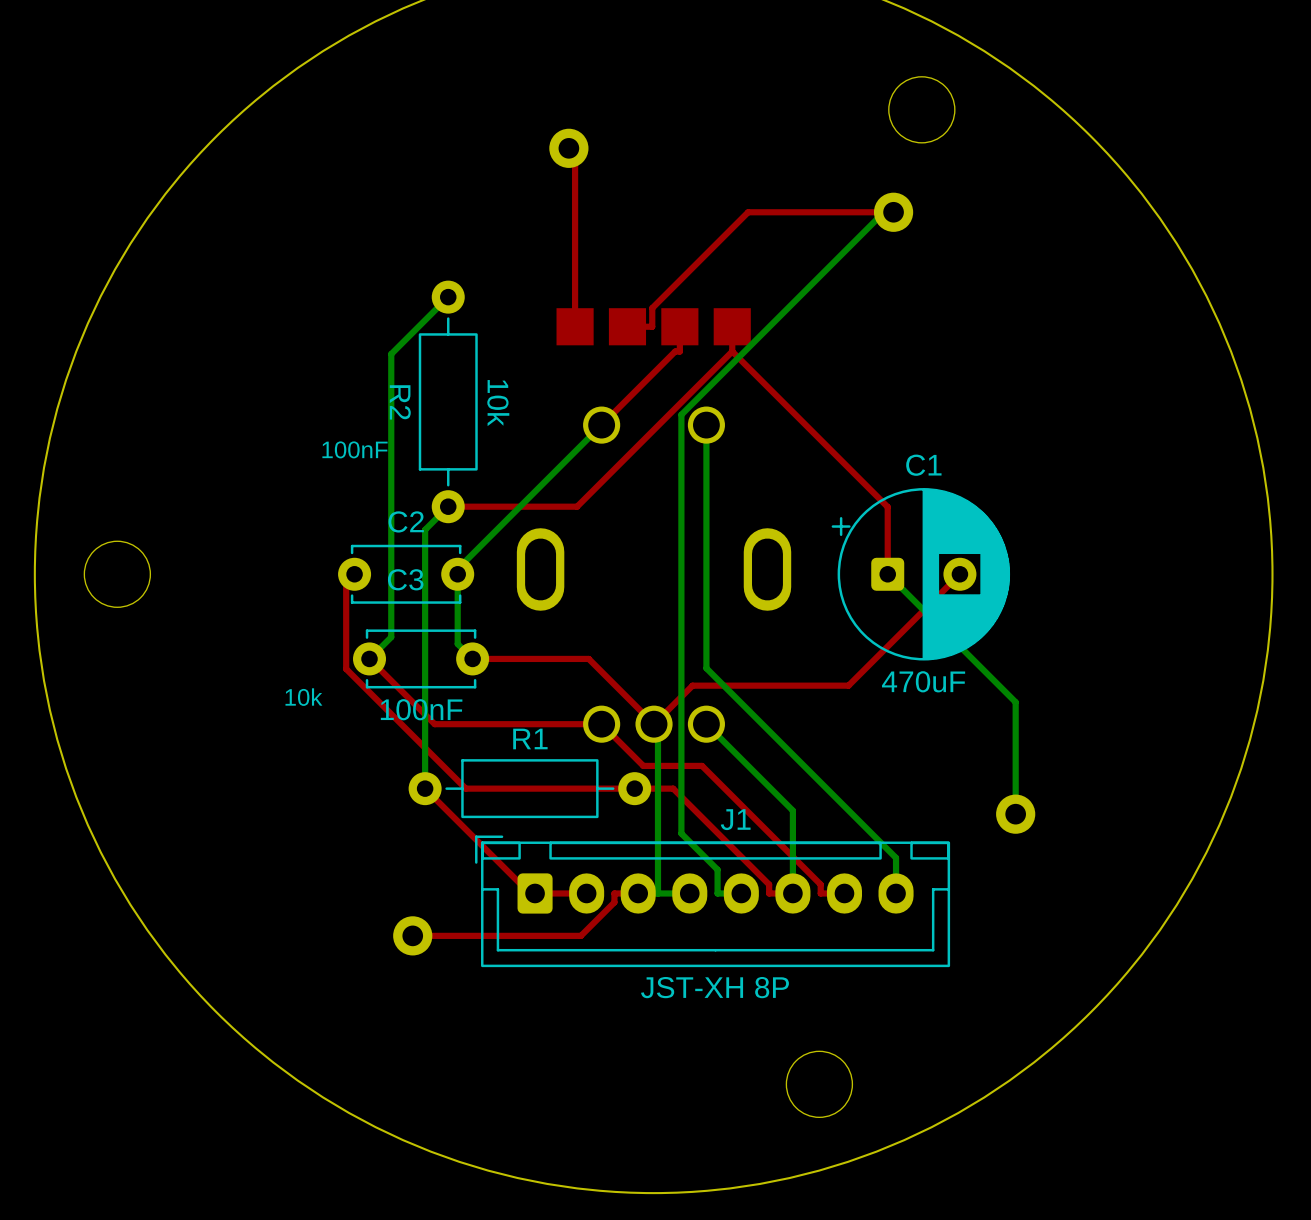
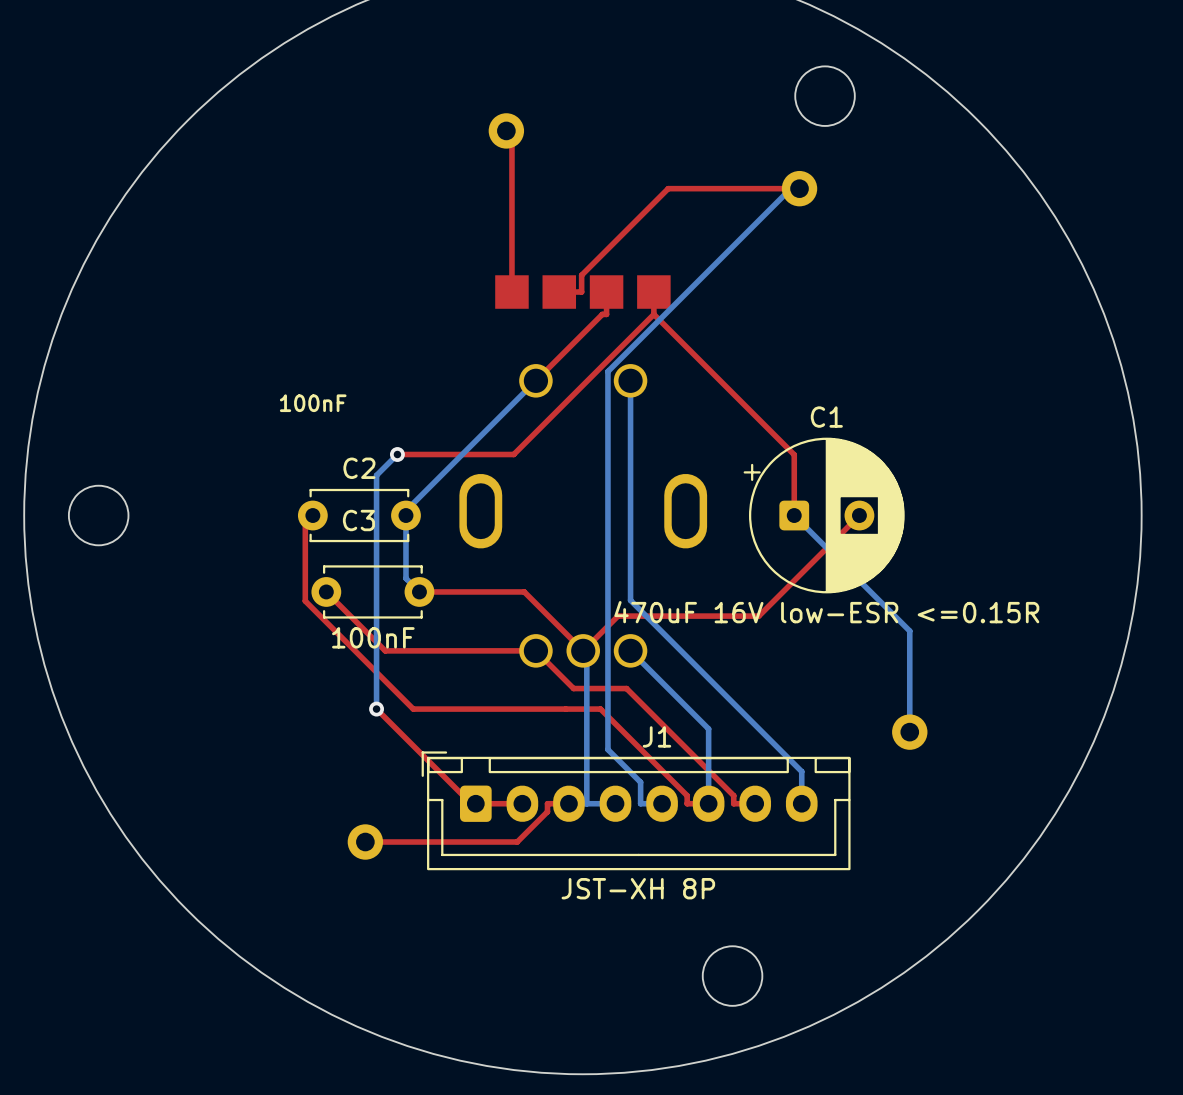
bottom track: (448, 297) (391, 354) (391, 637) (369, 658) -> none
R2: 10k (448, 401) -> none
via: none -> (397, 454)
C1 value: 470uF (923, 681) -> 470uF 16V low-ESR <=0.15R (826, 612)
via: none -> (376, 709)
R1: 10k (529, 788) -> none

